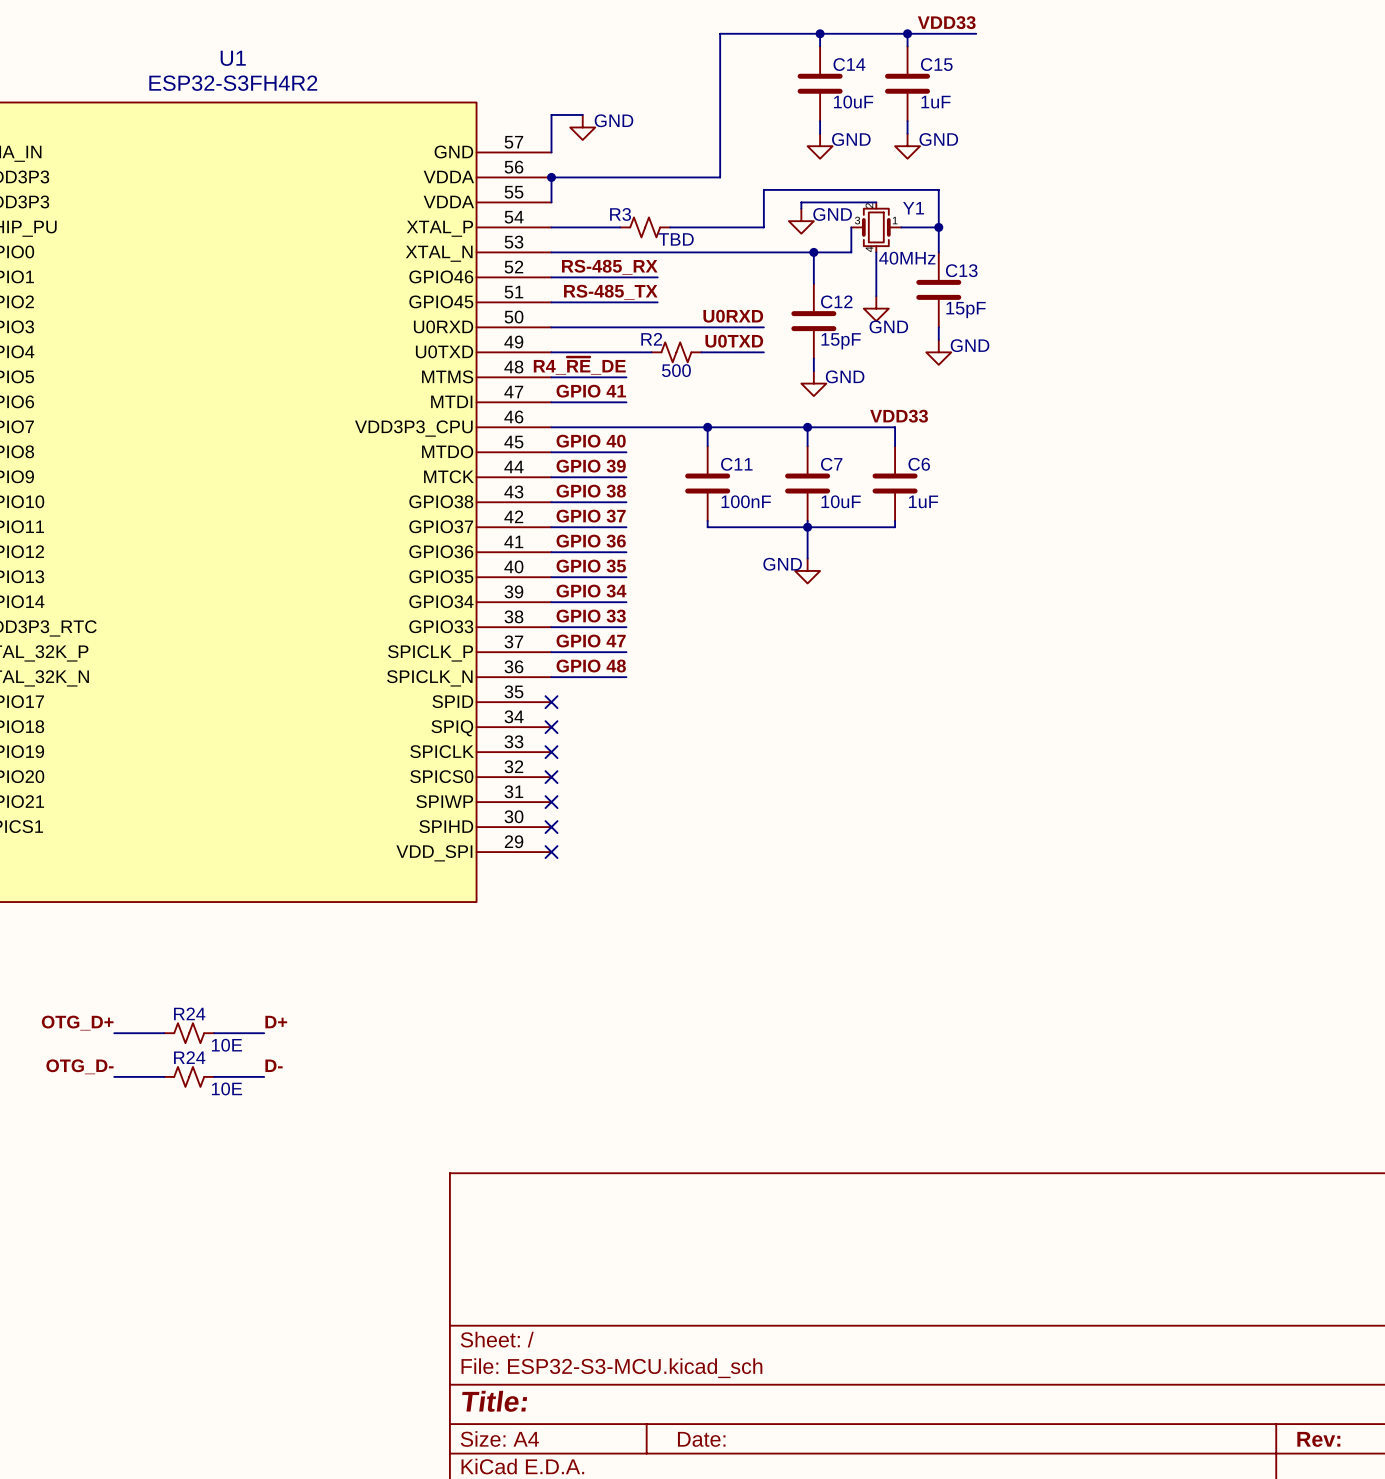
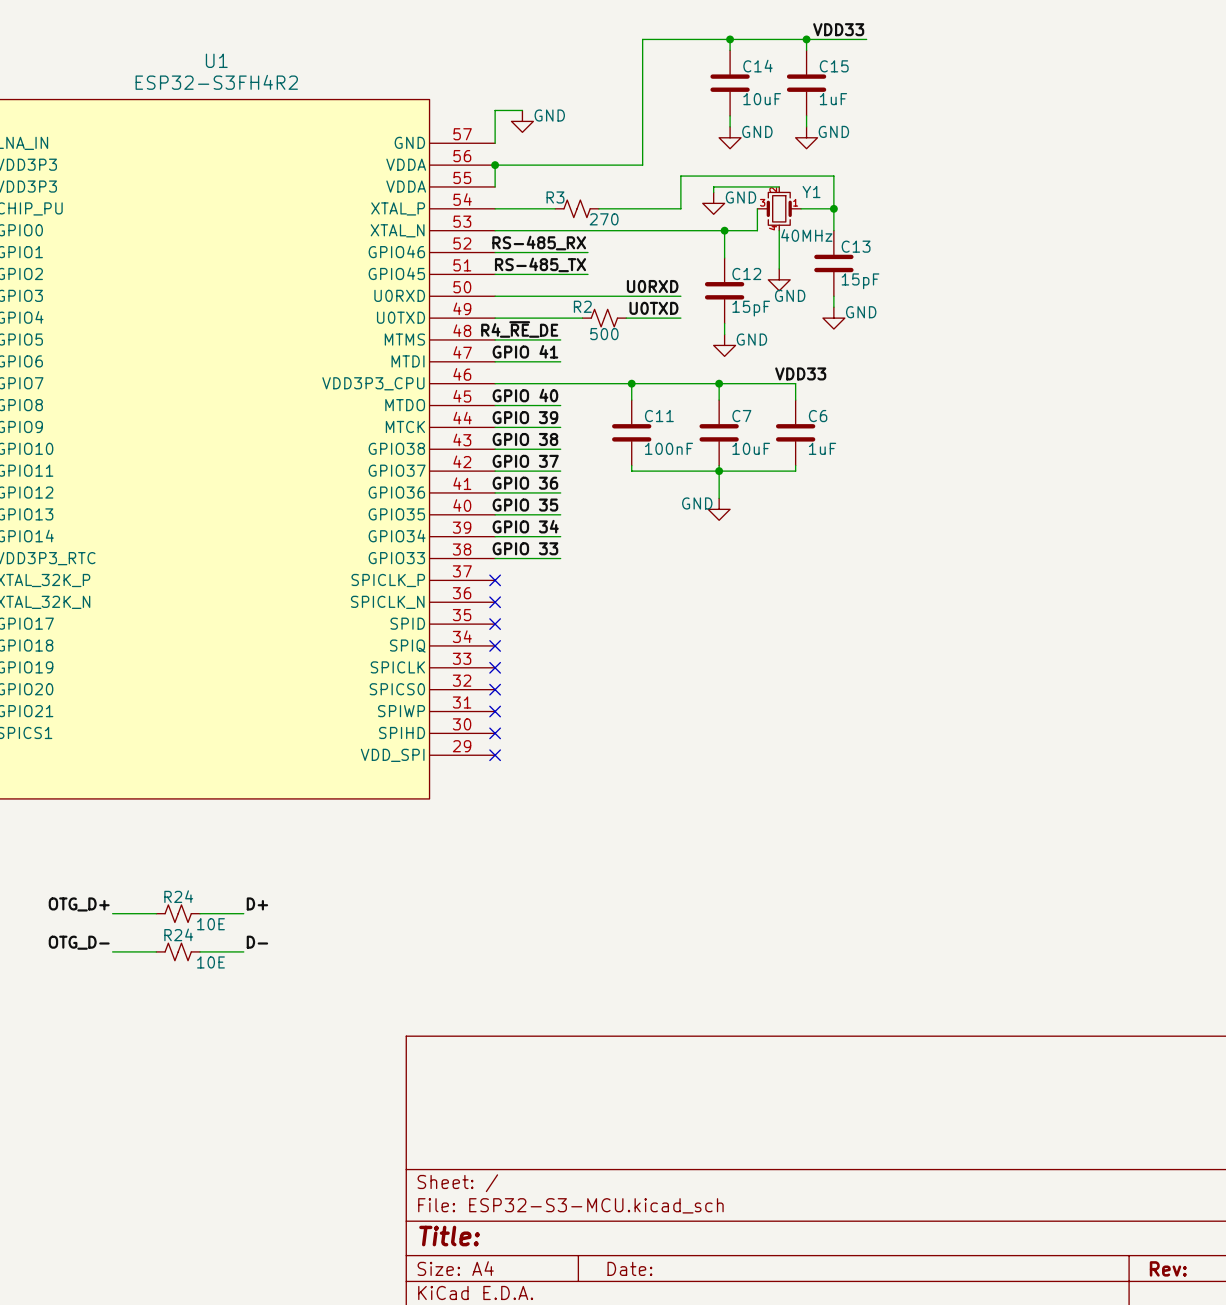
R3 value: TBD (676, 239) -> 270 (604, 219)
label: GPIO 47 (591, 641) -> none
wire: (551, 652) (626, 652) -> none
no-connect mark: none -> (495, 580)
label: GPIO 48 (591, 666) -> none
wire: (551, 677) (626, 677) -> none
no-connect mark: none -> (495, 602)

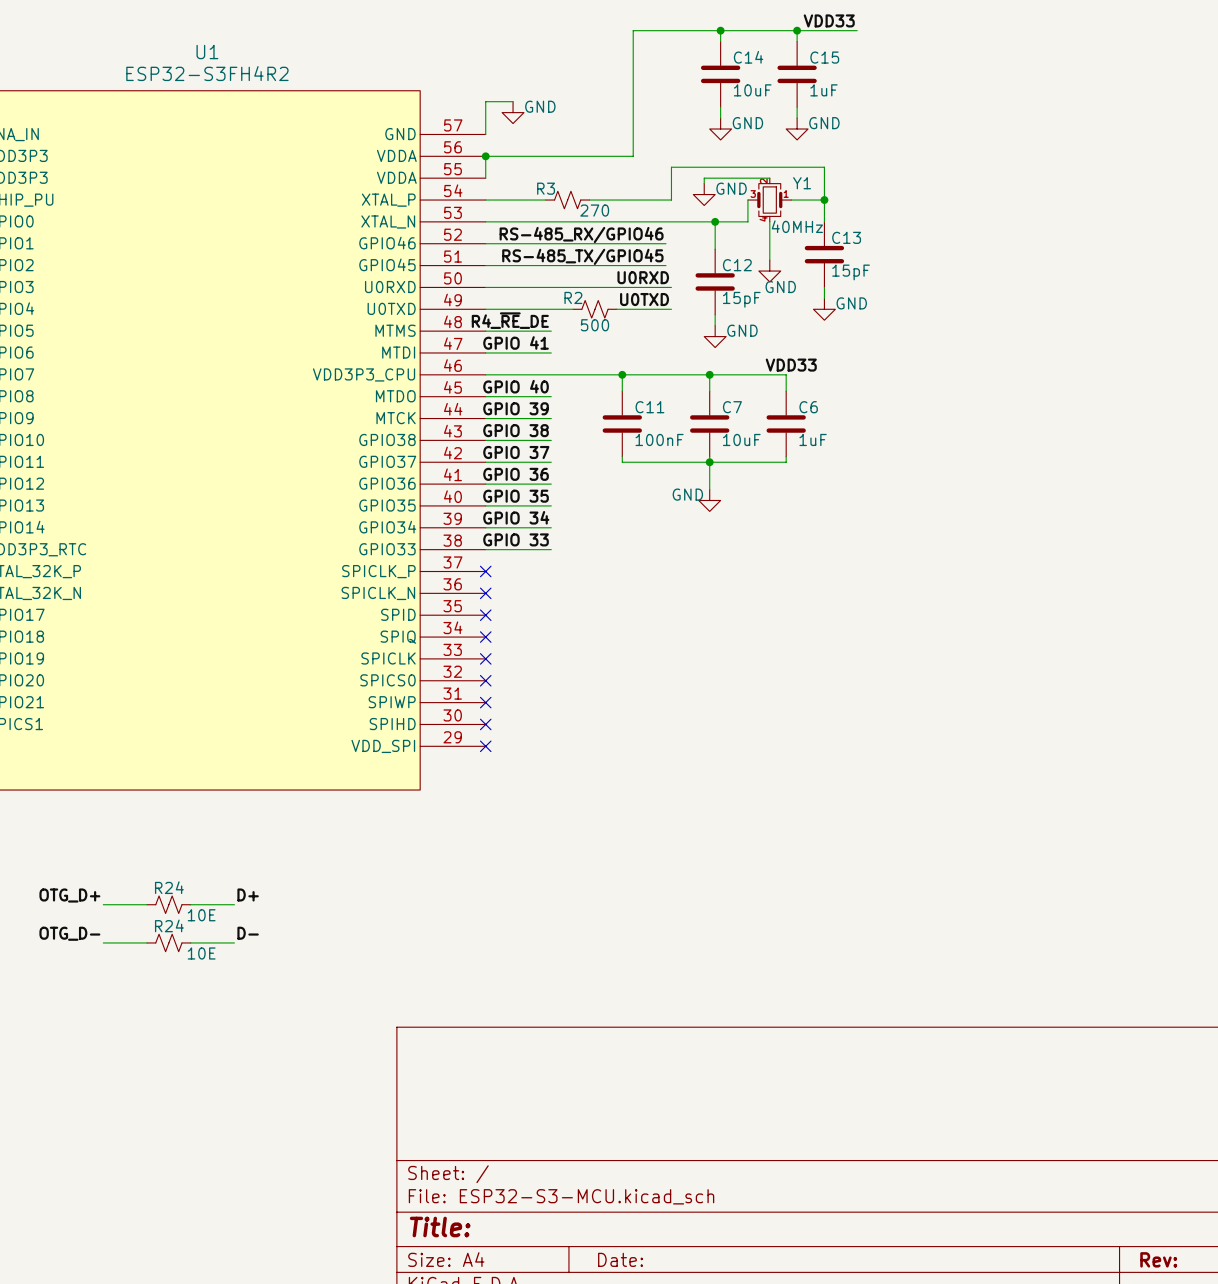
label: RS-485_RX (539, 243) -> none
label: none -> RS-485_RX/GPIO46 (581, 235)
wire: none -> (578, 243) (666, 243)
label: RS-485_TX (540, 264) -> none
label: none -> RS-485_TX/GPIO45 (582, 256)
wire: none -> (578, 265) (666, 265)

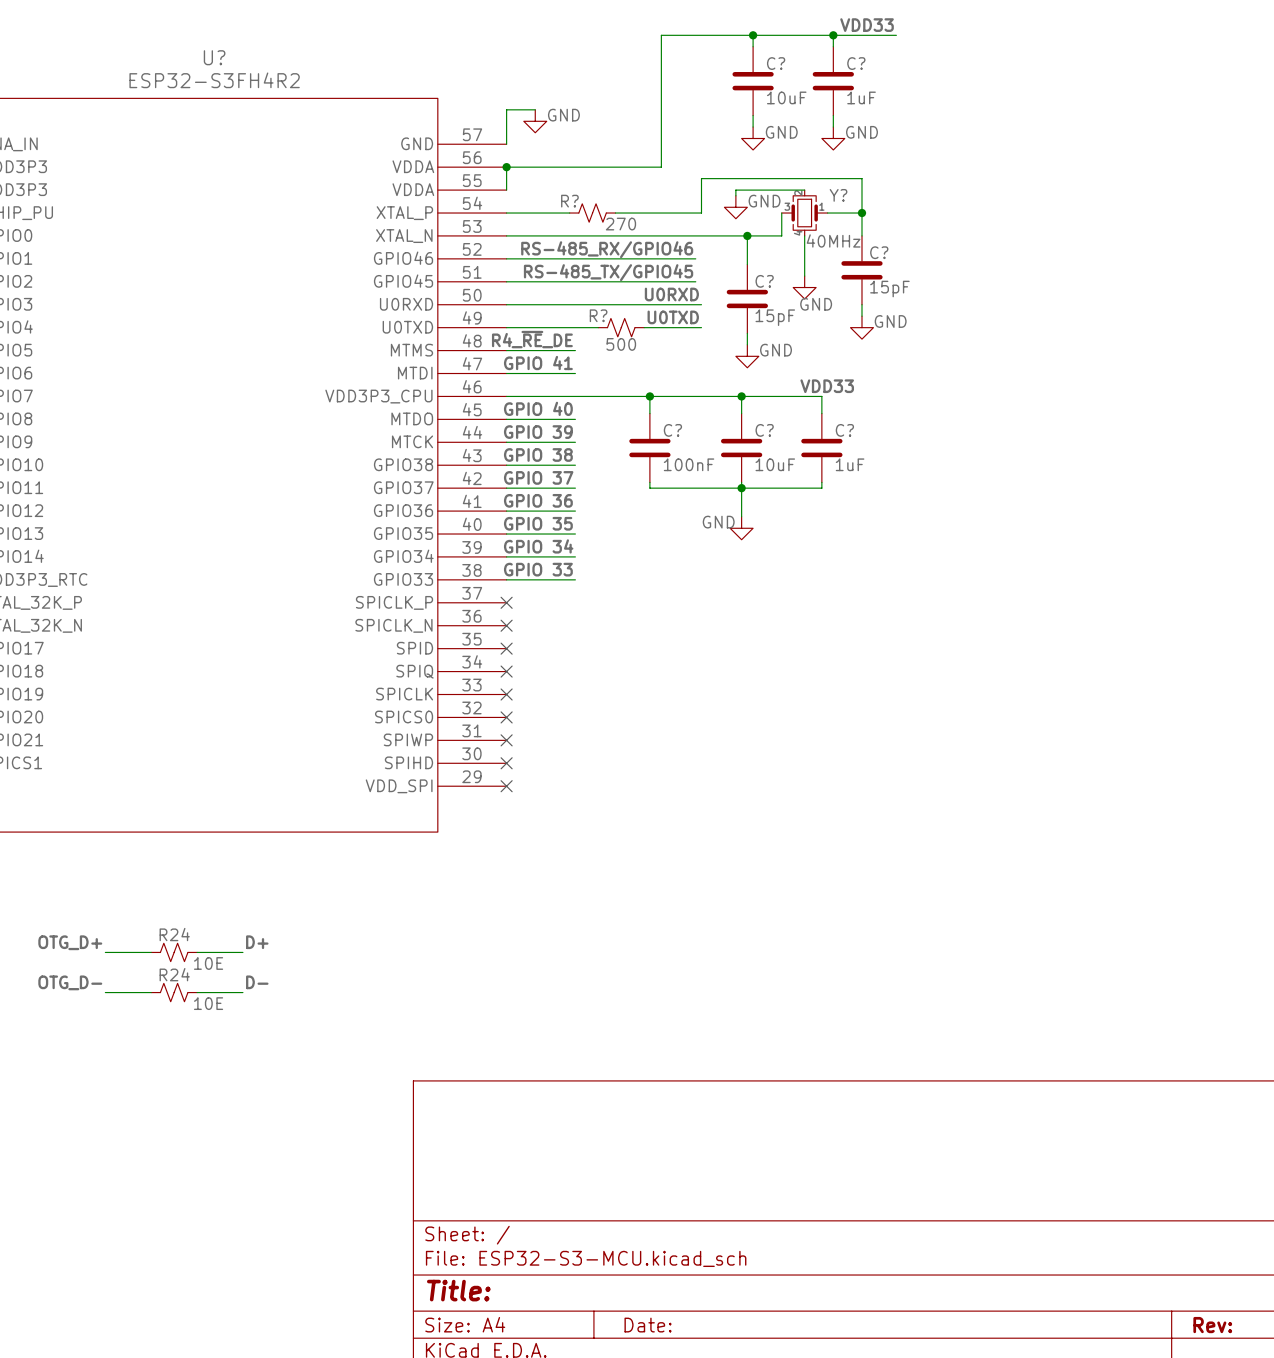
U1 name: U1 (207, 52) -> U? (214, 57)
C14 name: C14 (748, 57) -> C? (776, 63)
C15 name: C15 (824, 57) -> C? (856, 63)
Y1 name: Y1 (802, 183) -> Y? (838, 195)
R3 name: R3 (546, 188) -> R? (569, 201)
C13 name: C13 (846, 237) -> C? (879, 252)
C12 name: C12 (737, 265) -> C? (764, 281)
R2 name: R2 (573, 297) -> R? (598, 315)
C11 name: C11 (649, 407) -> C? (672, 430)
C7 name: C7 (732, 407) -> C? (764, 430)
C6 name: C6 (808, 407) -> C? (844, 430)

